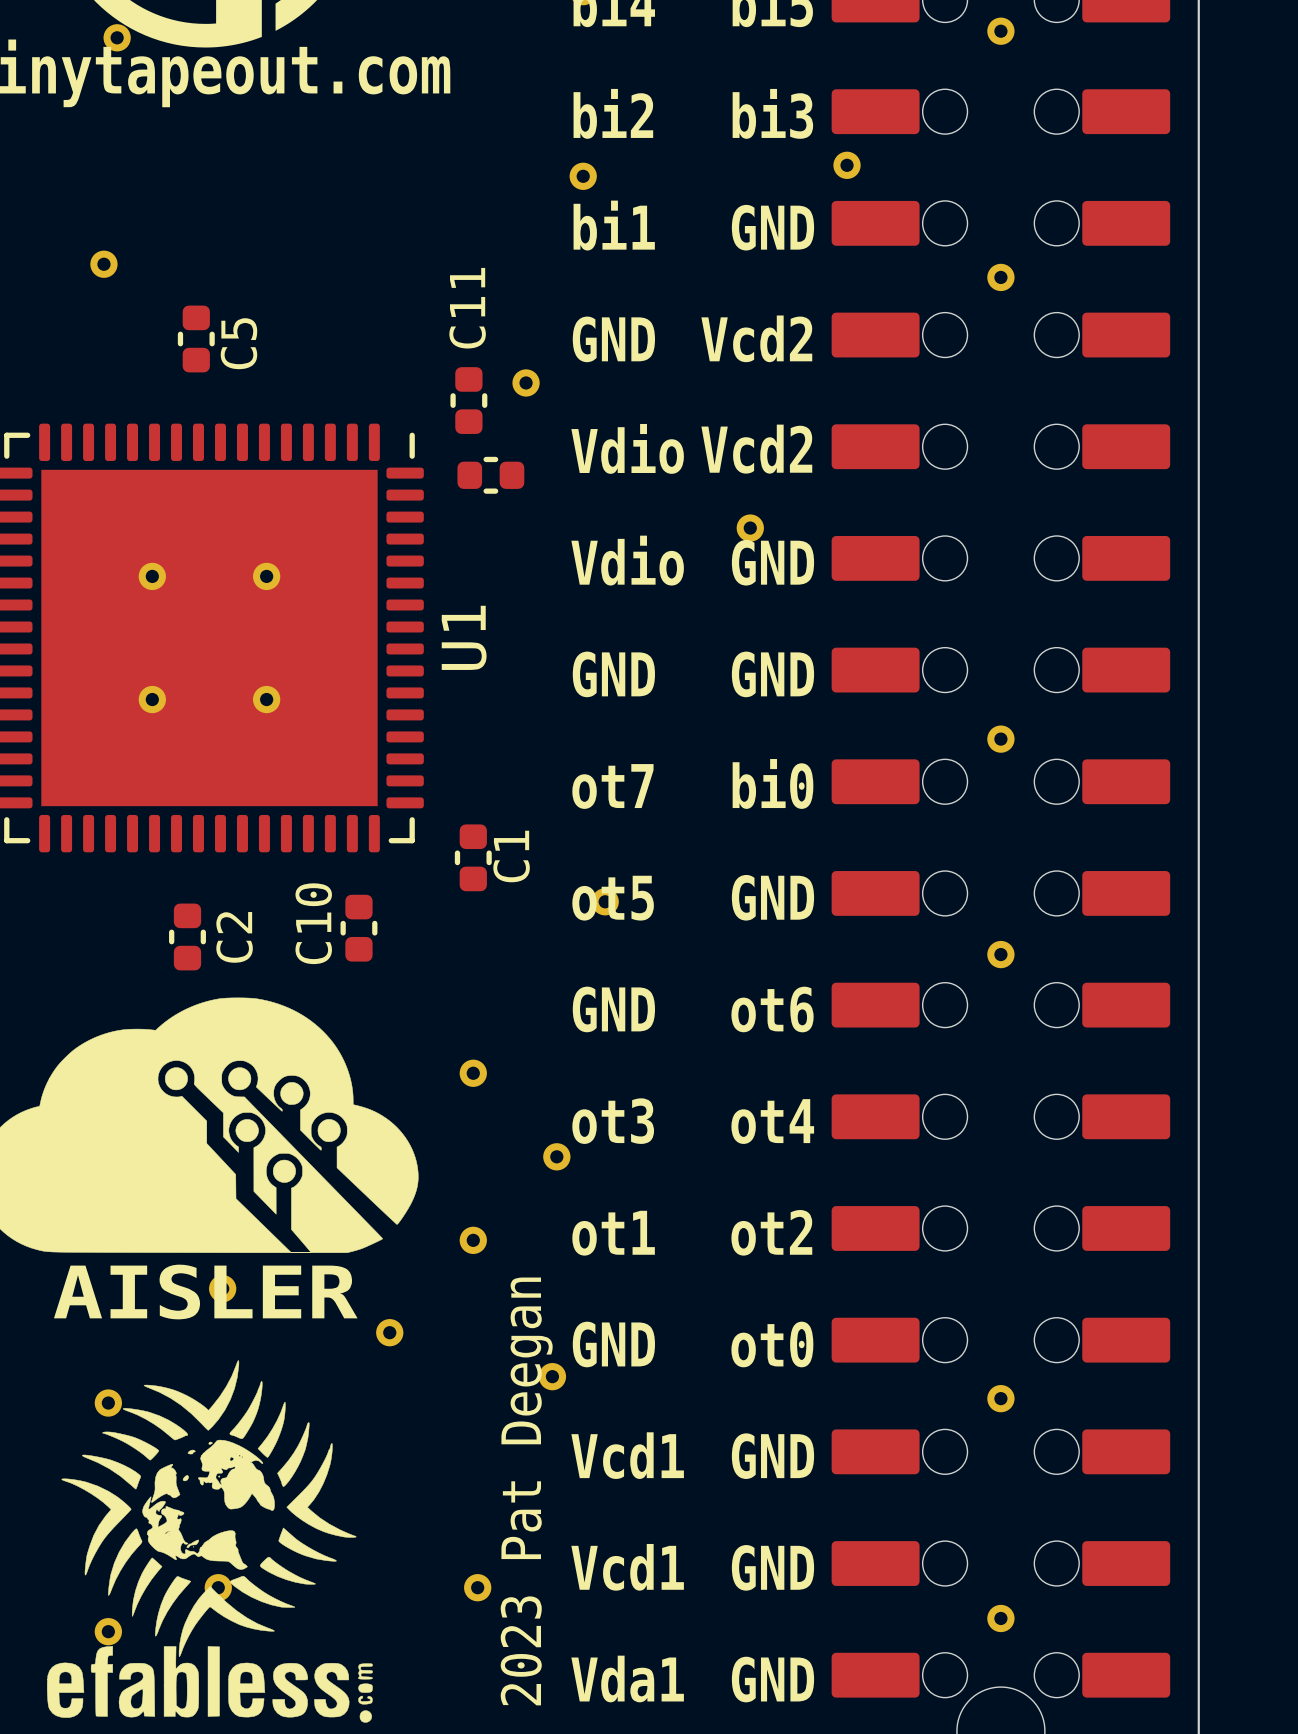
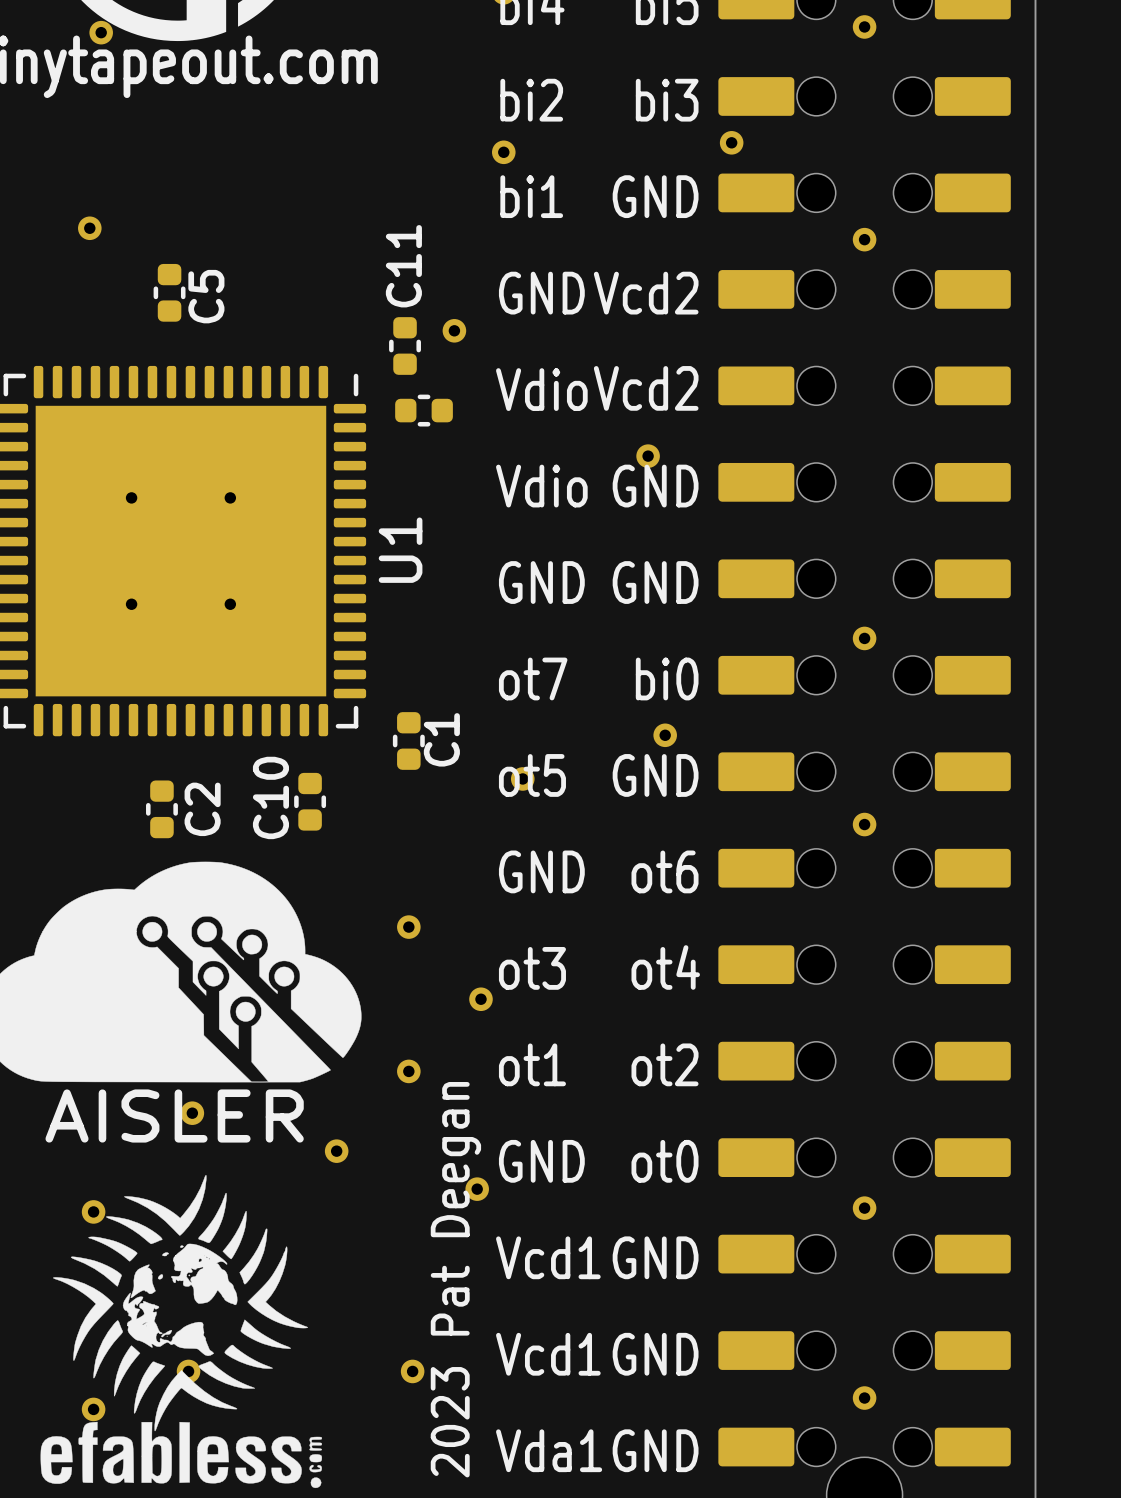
part: none -> (665, 735)

